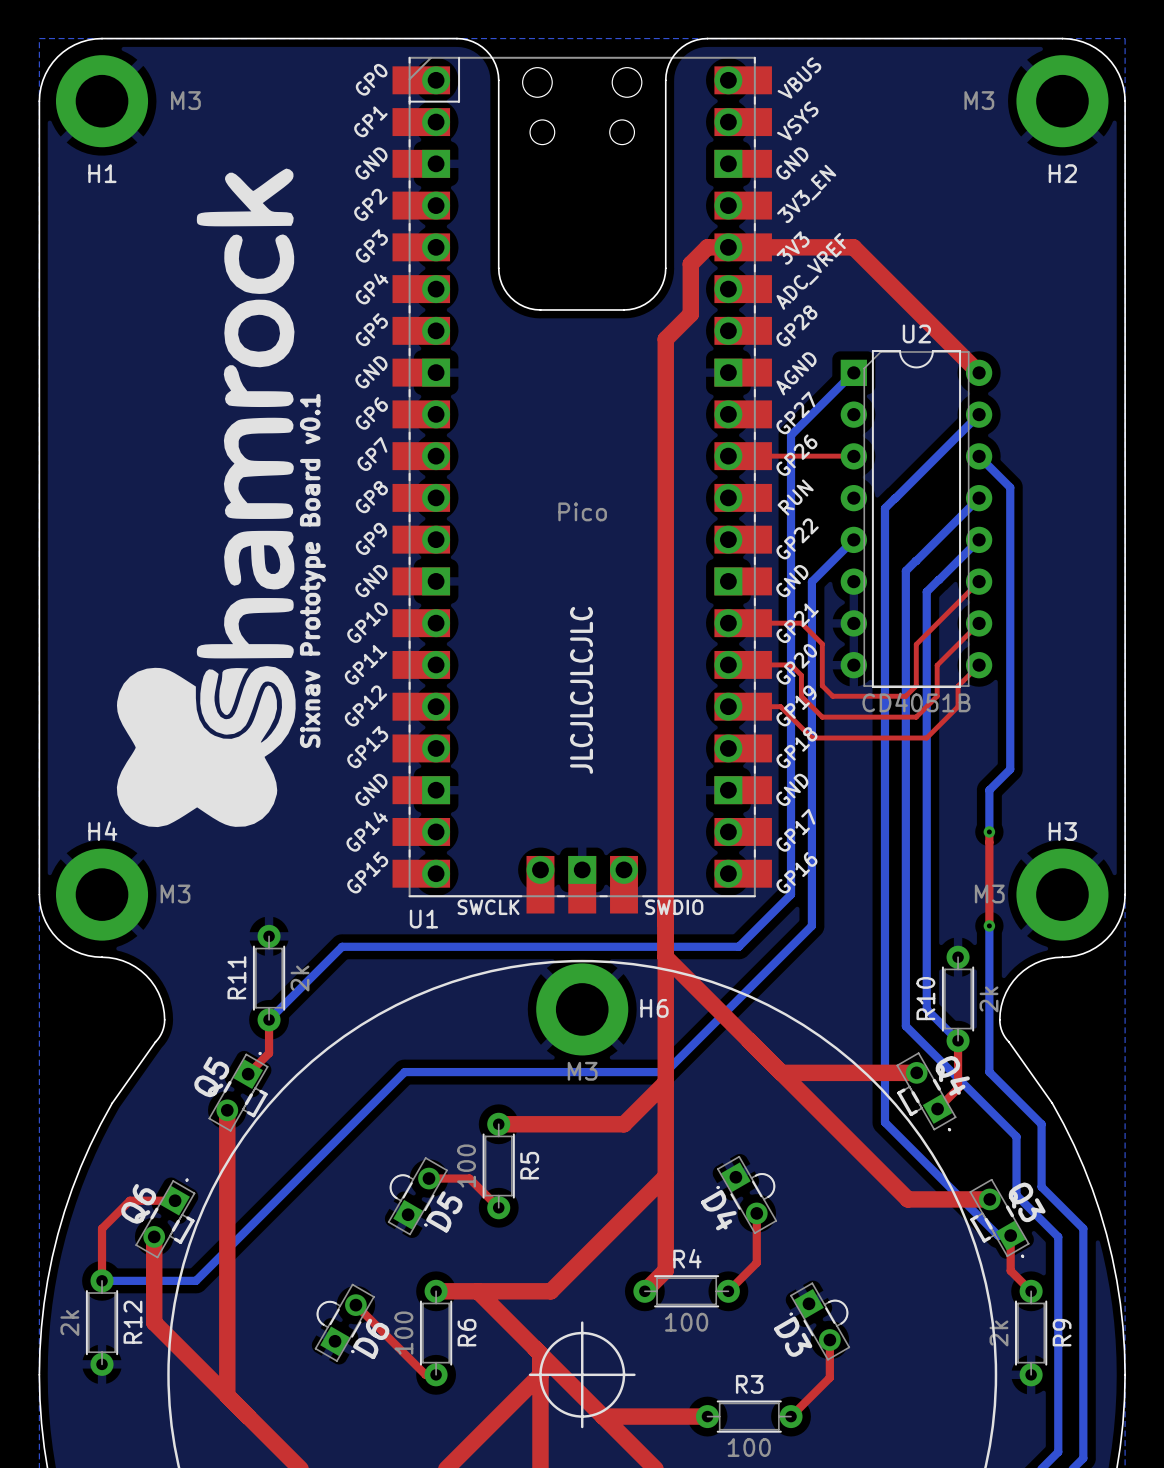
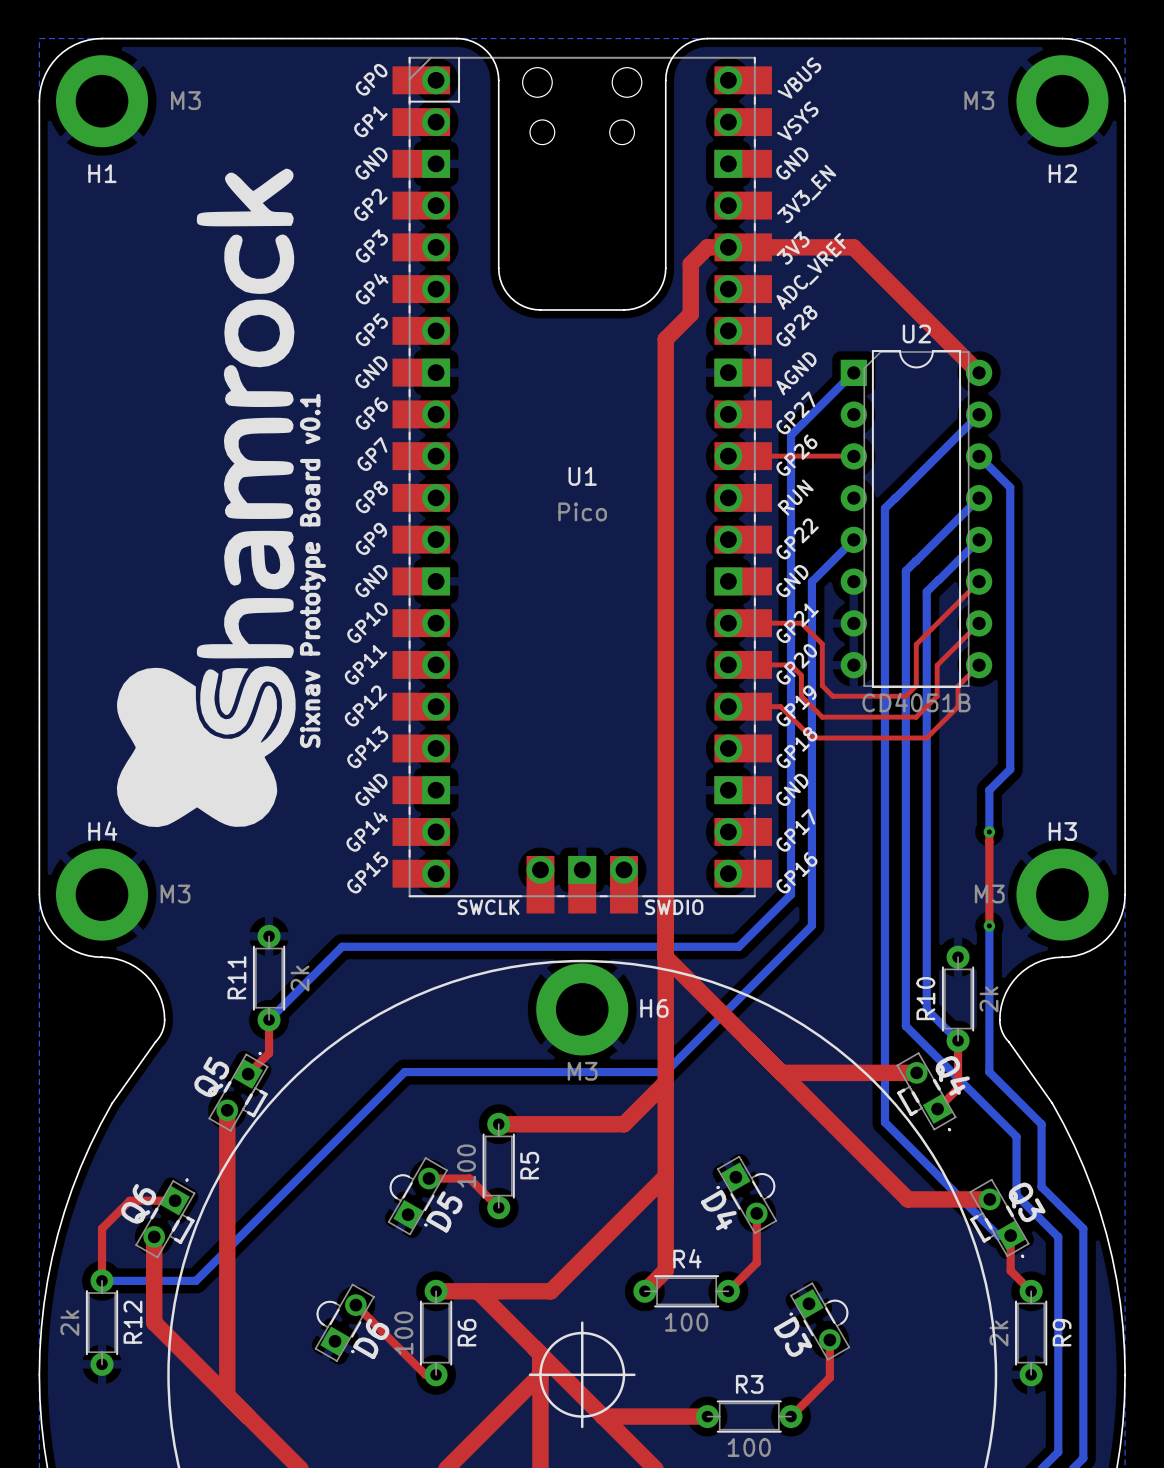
text: JLCJLCJLCJLC (581, 690) -> none
U1 name position: U1 (423, 919) -> U1 (582, 476)

